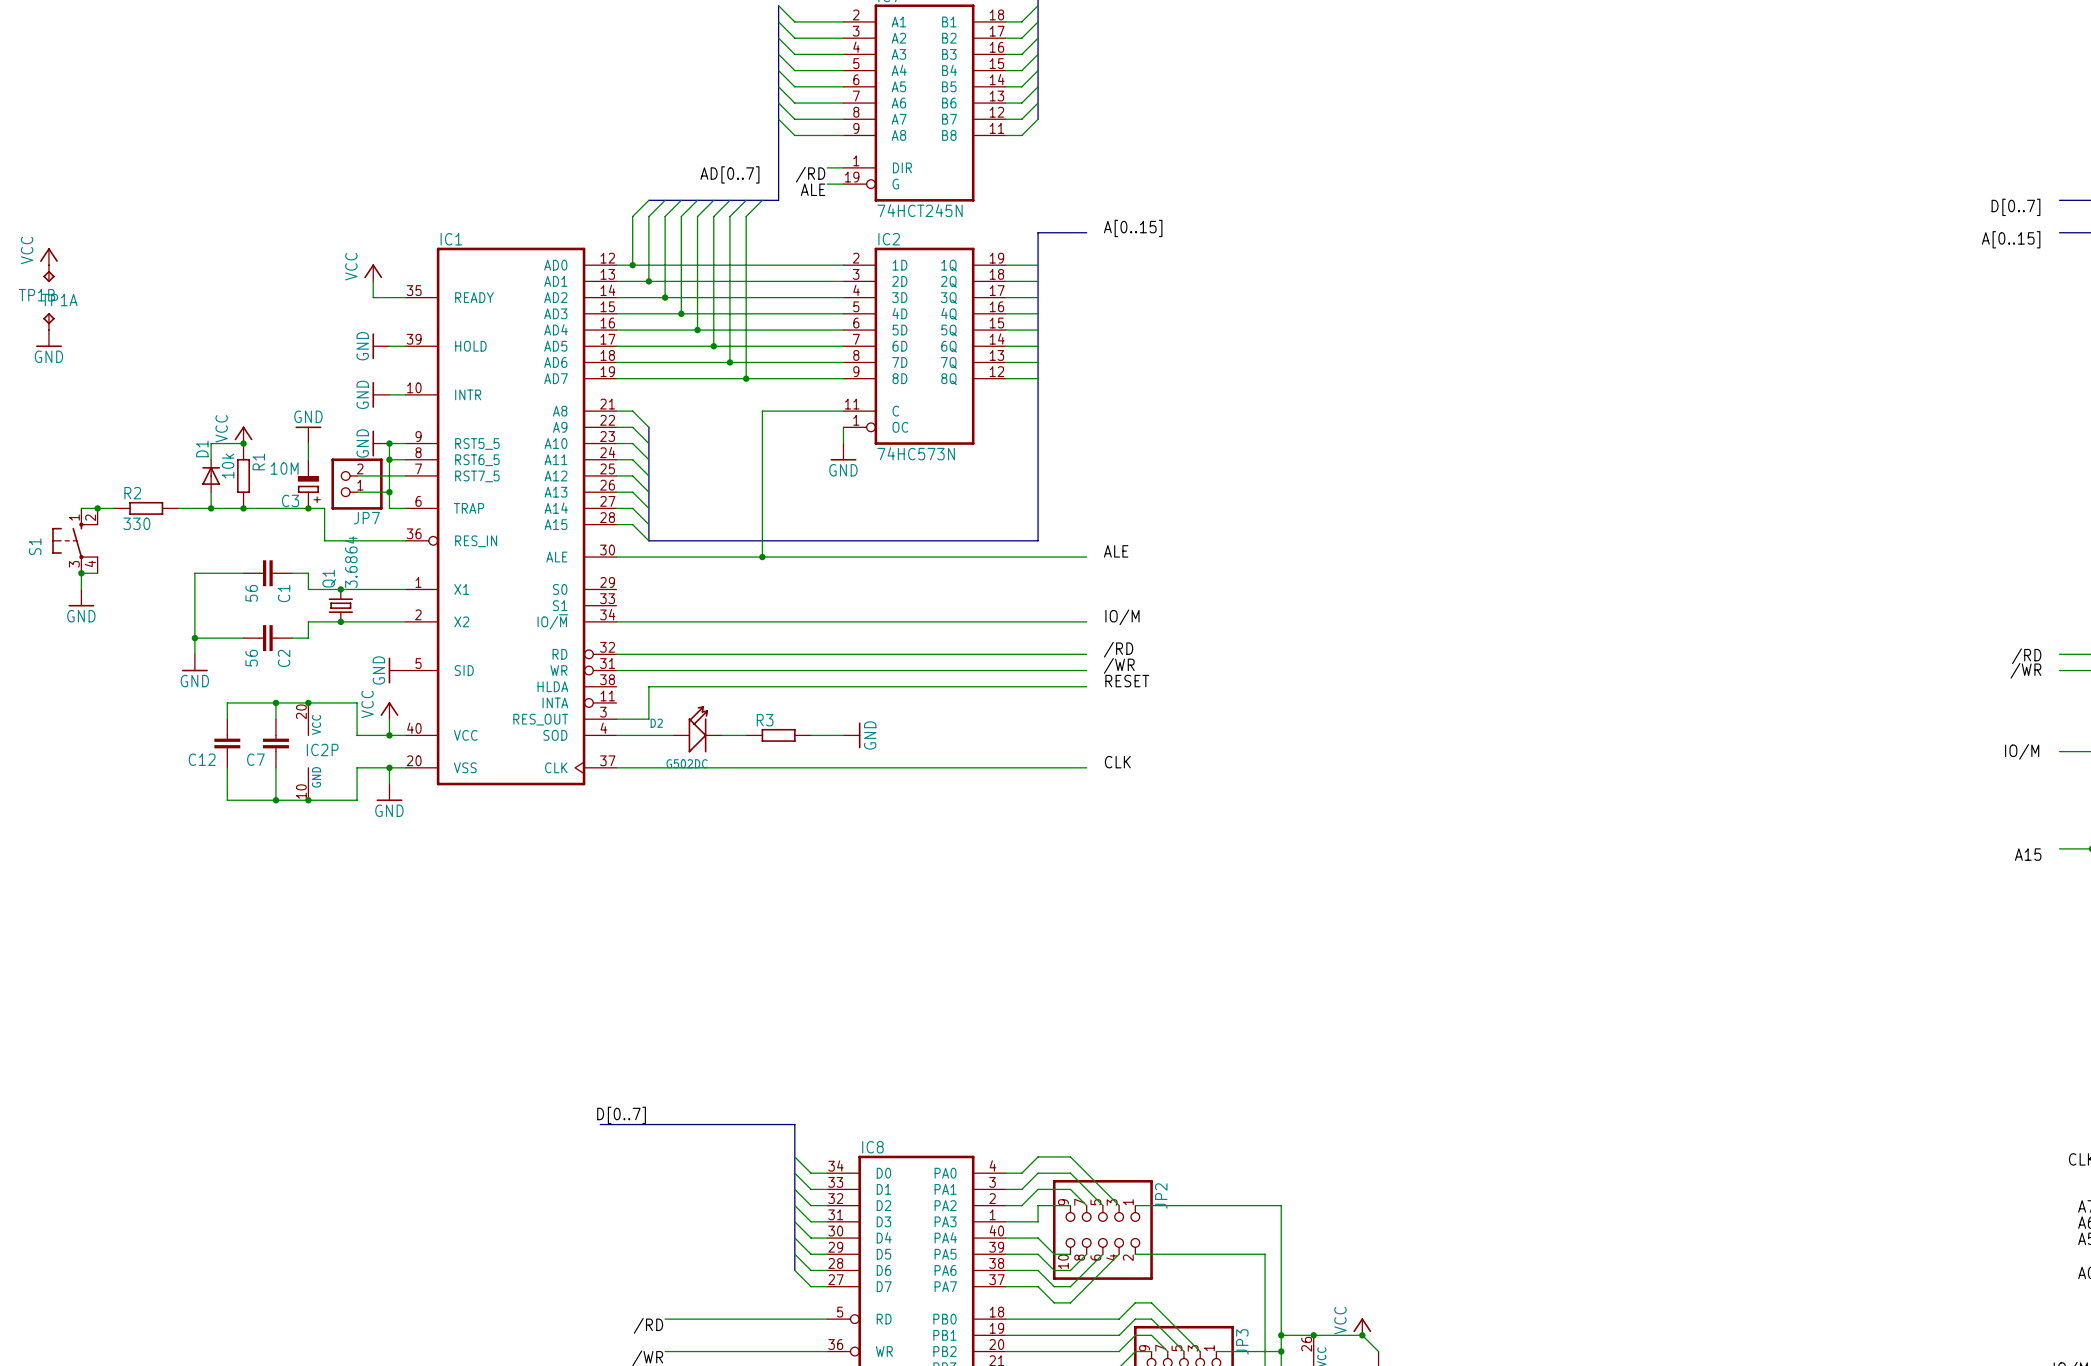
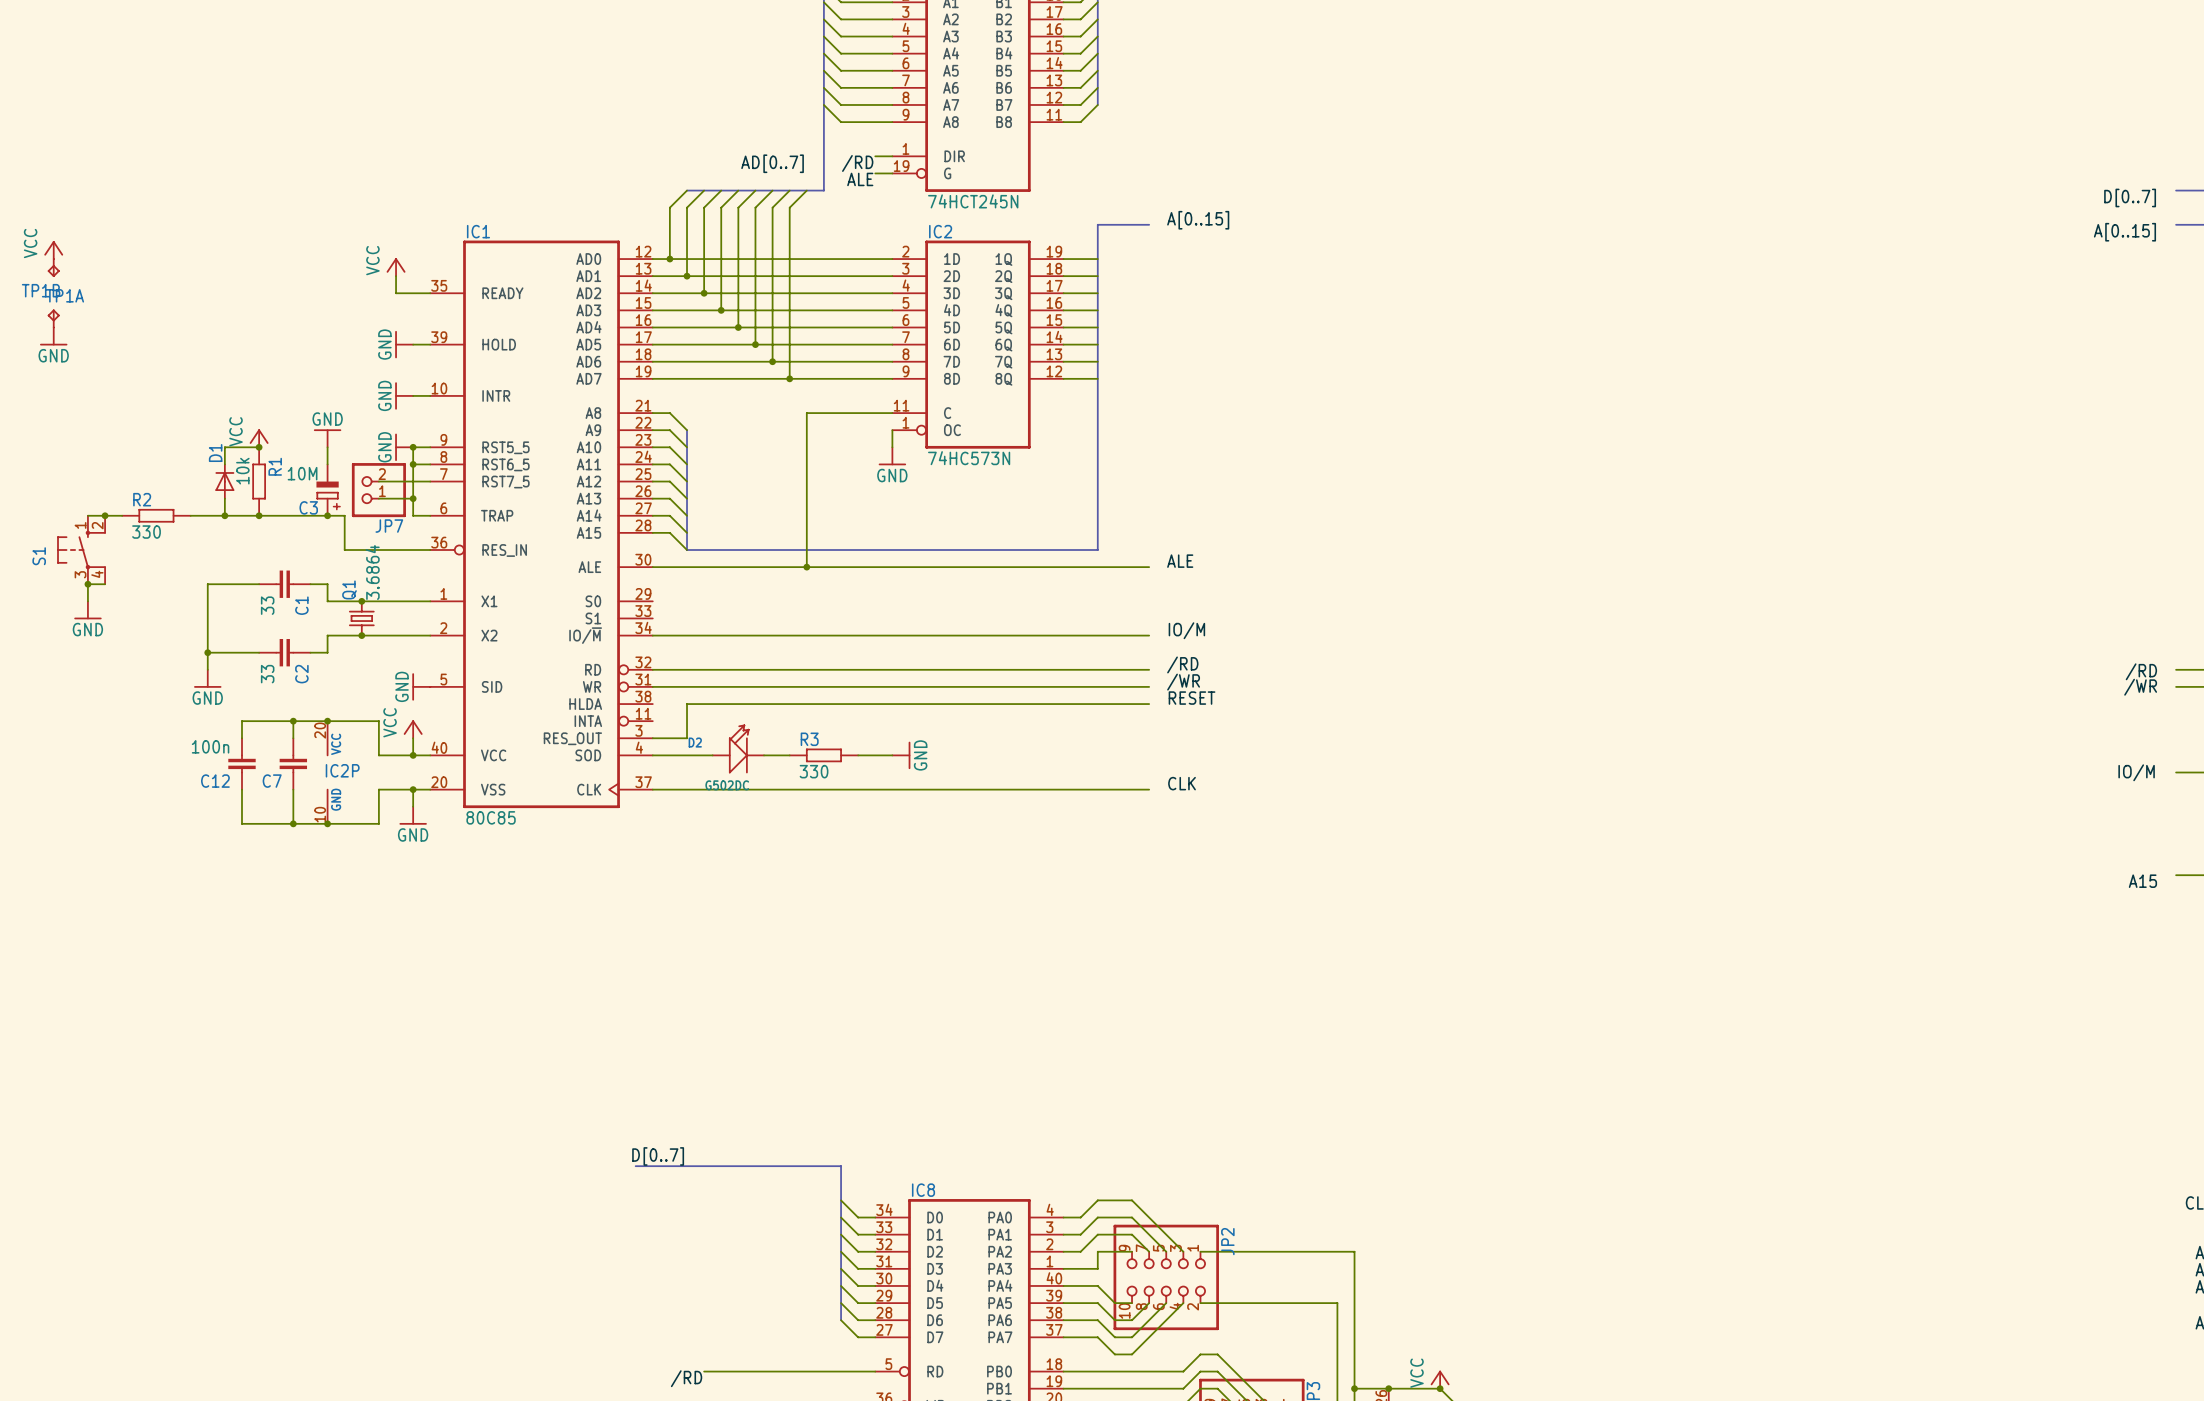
C1 value: 56 (251, 593) -> 33 (267, 605)
C2 value: 56 (251, 658) -> 33 (267, 674)
C12 value: none -> 100n (210, 746)
R3 value: none -> 330 (814, 771)
IC1 value: none -> 80C85 (491, 817)

